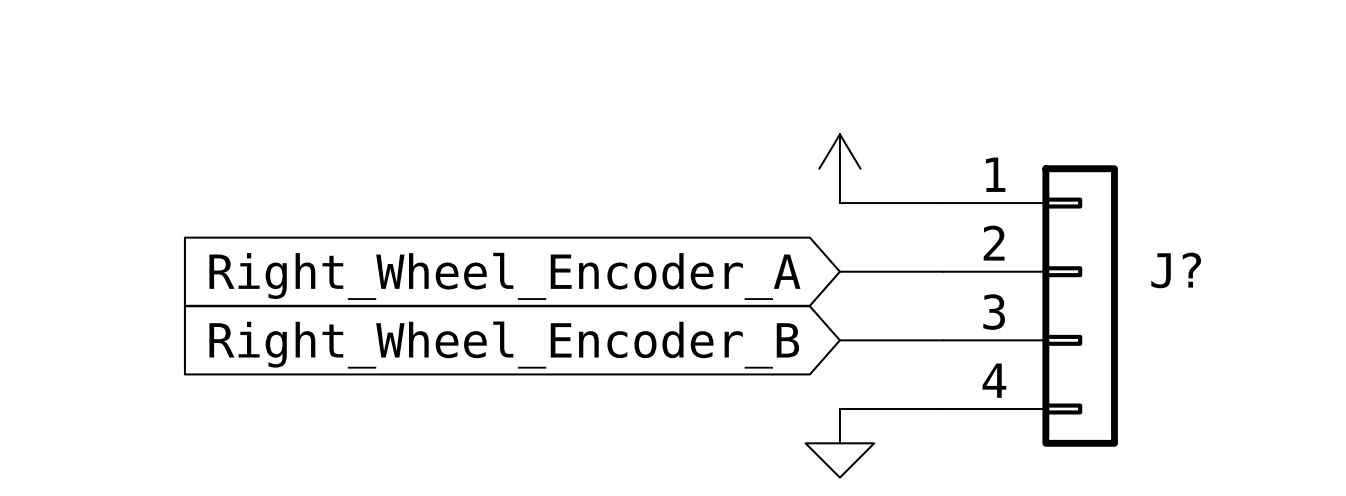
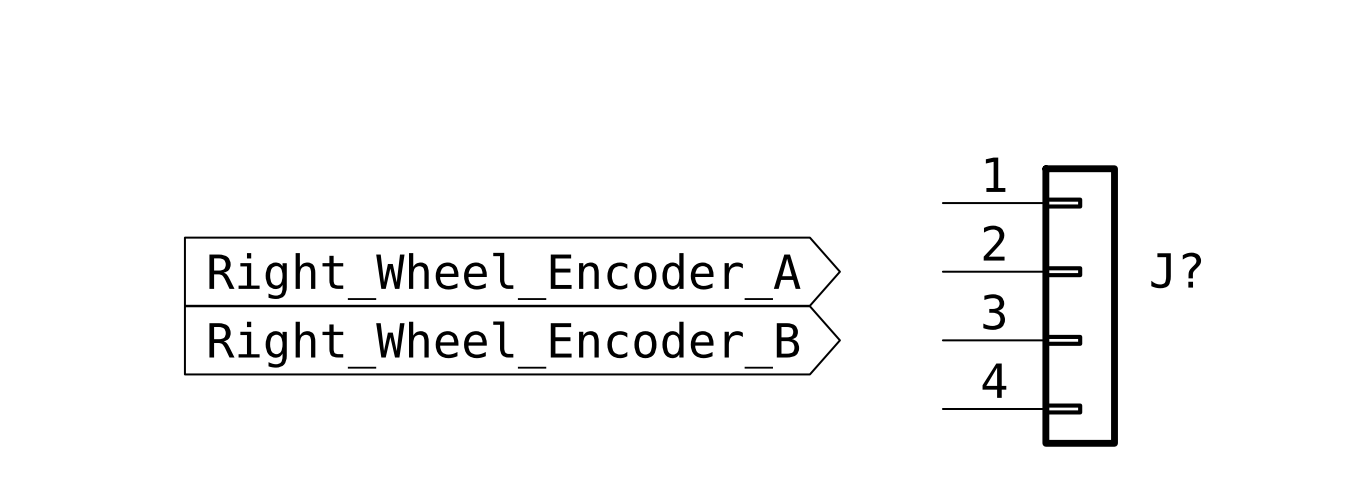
power symbol: (839, 168) -> none
wire: (839, 203) (942, 203) -> none
wire: (839, 271) (942, 271) -> none
wire: (839, 340) (942, 340) -> none
wire: (839, 408) (942, 408) -> none
power symbol: (839, 443) -> none

